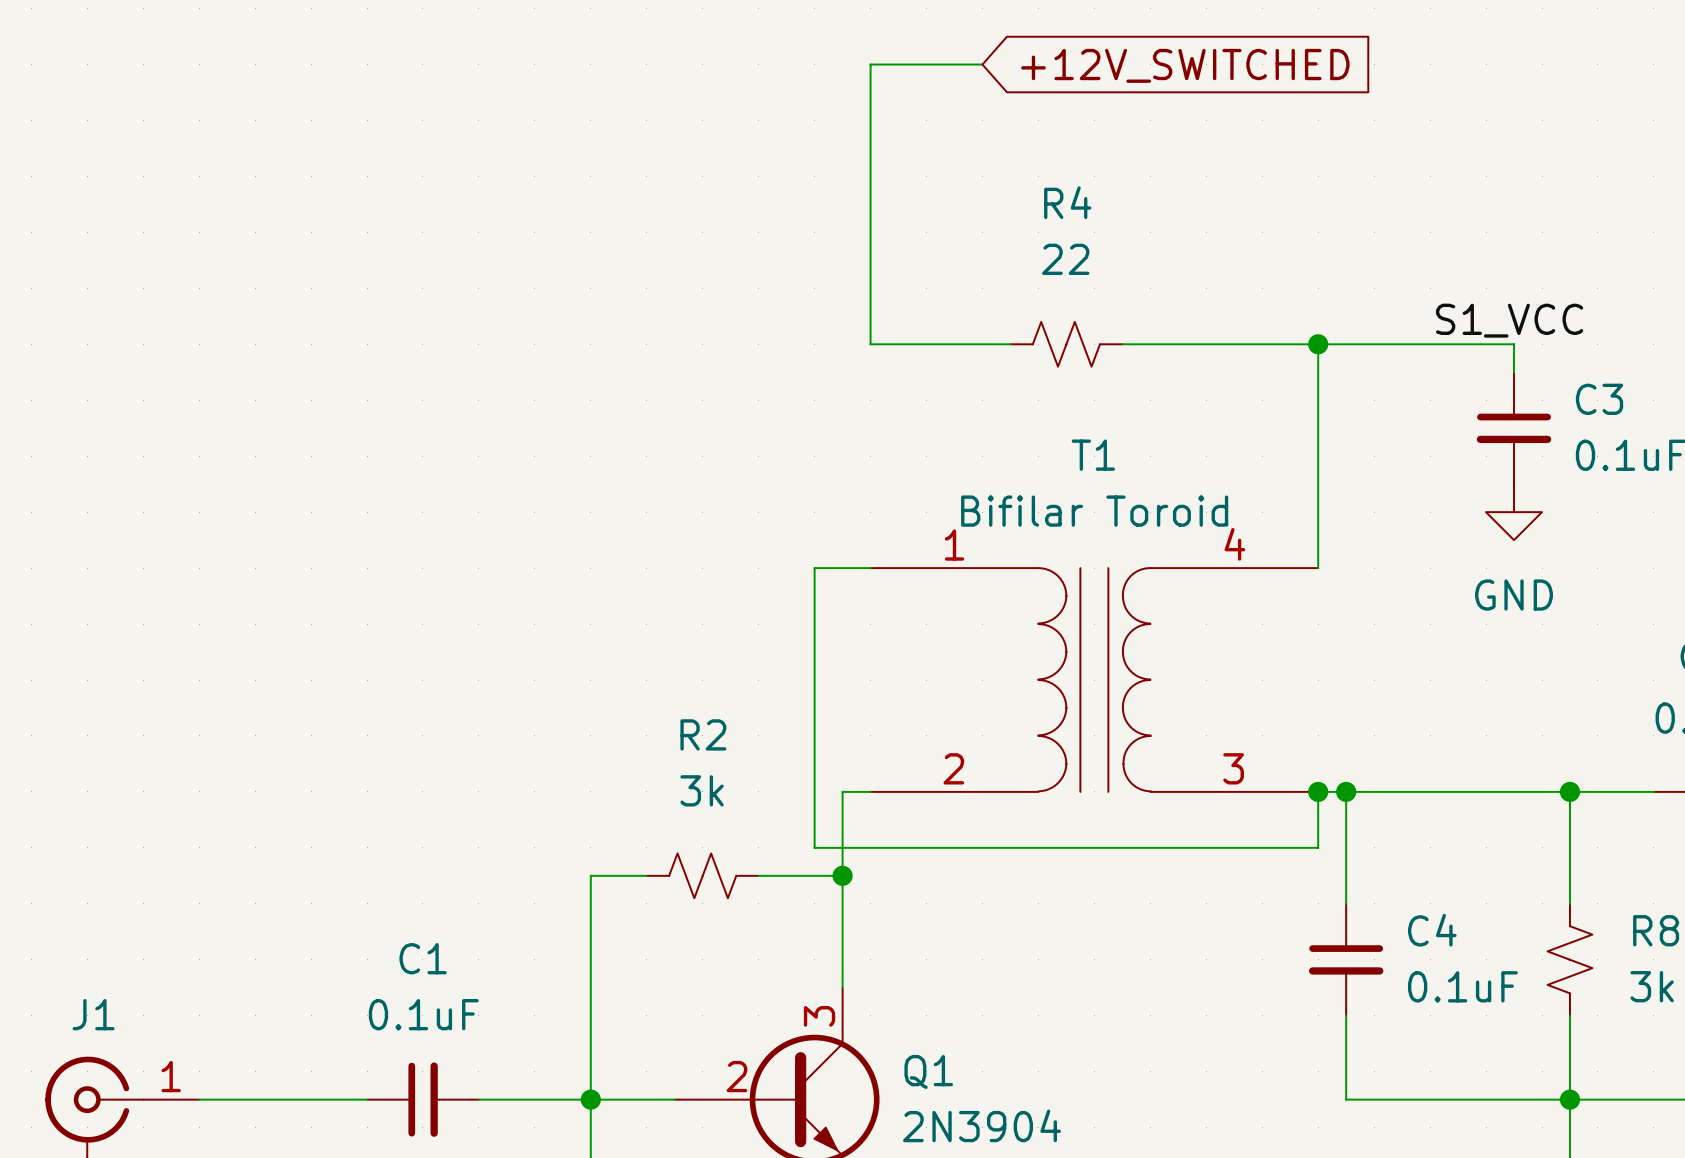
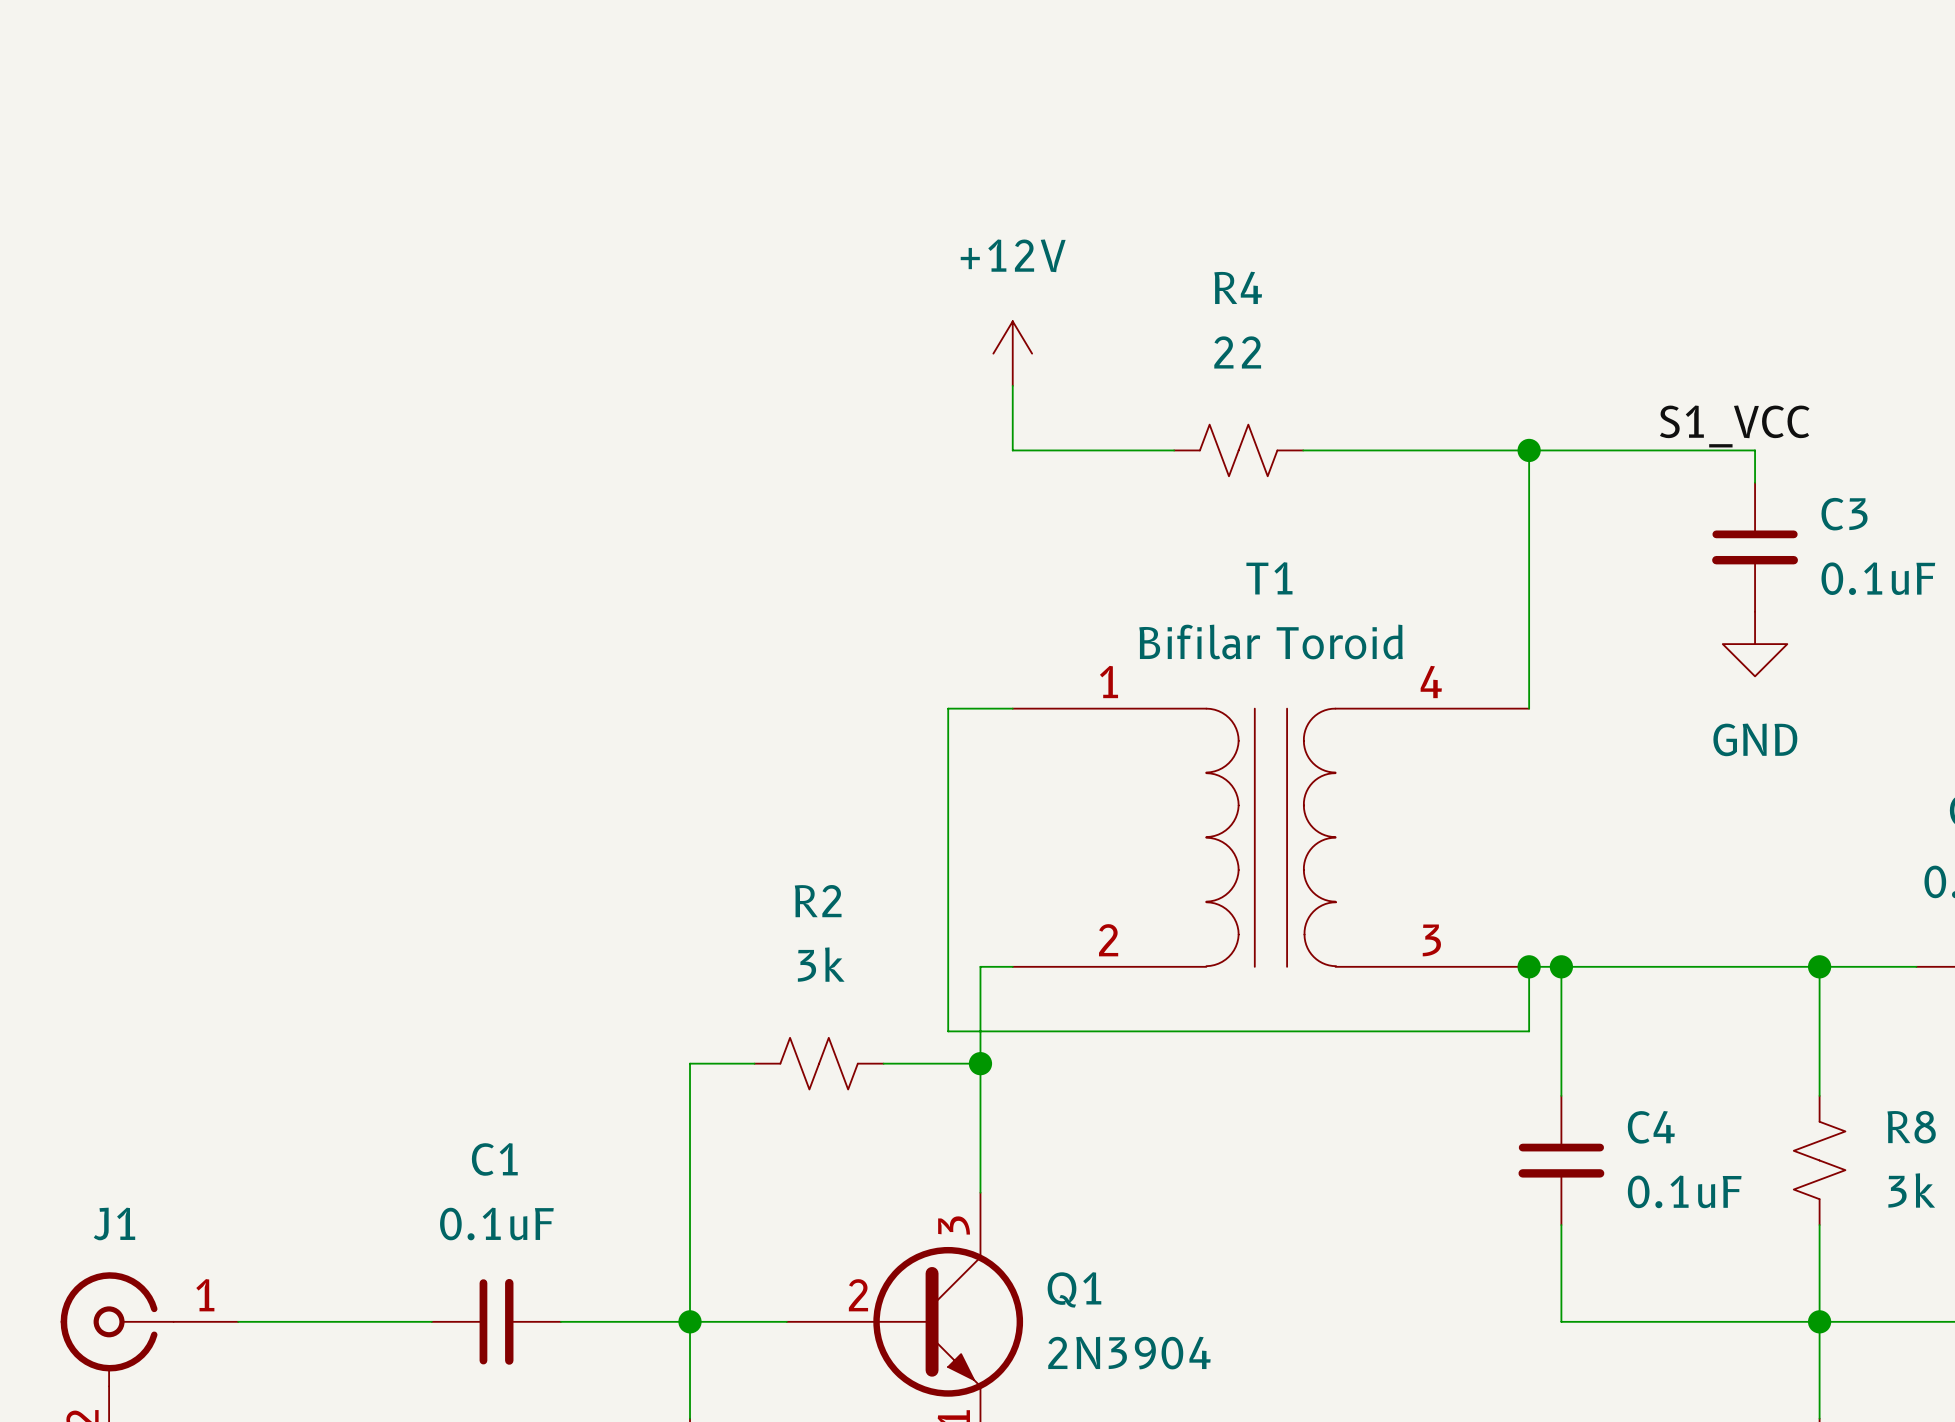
wire: (982, 64) (870, 64) (870, 288) -> none
global label: +12V_SWITCHED (1185, 65) -> none
power symbol: none -> +12V (1012, 353)

